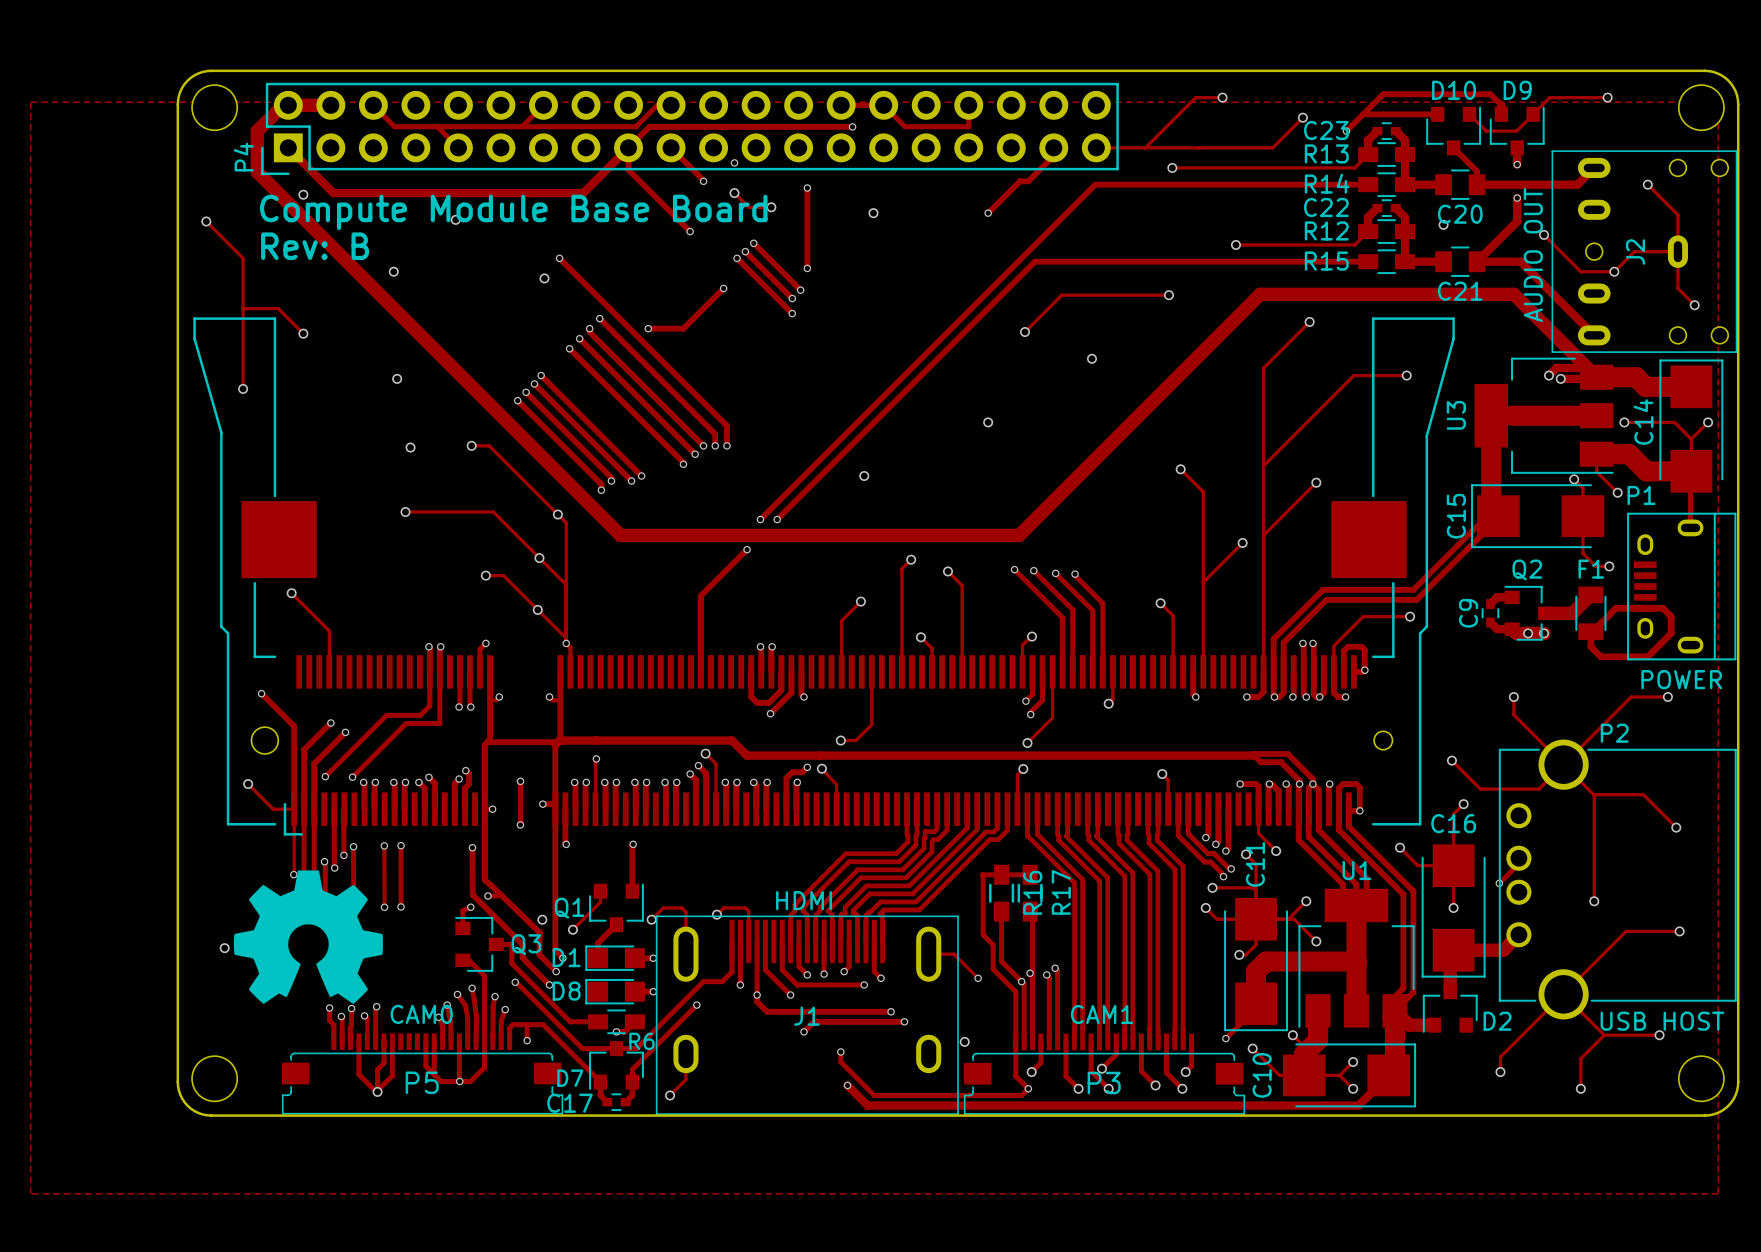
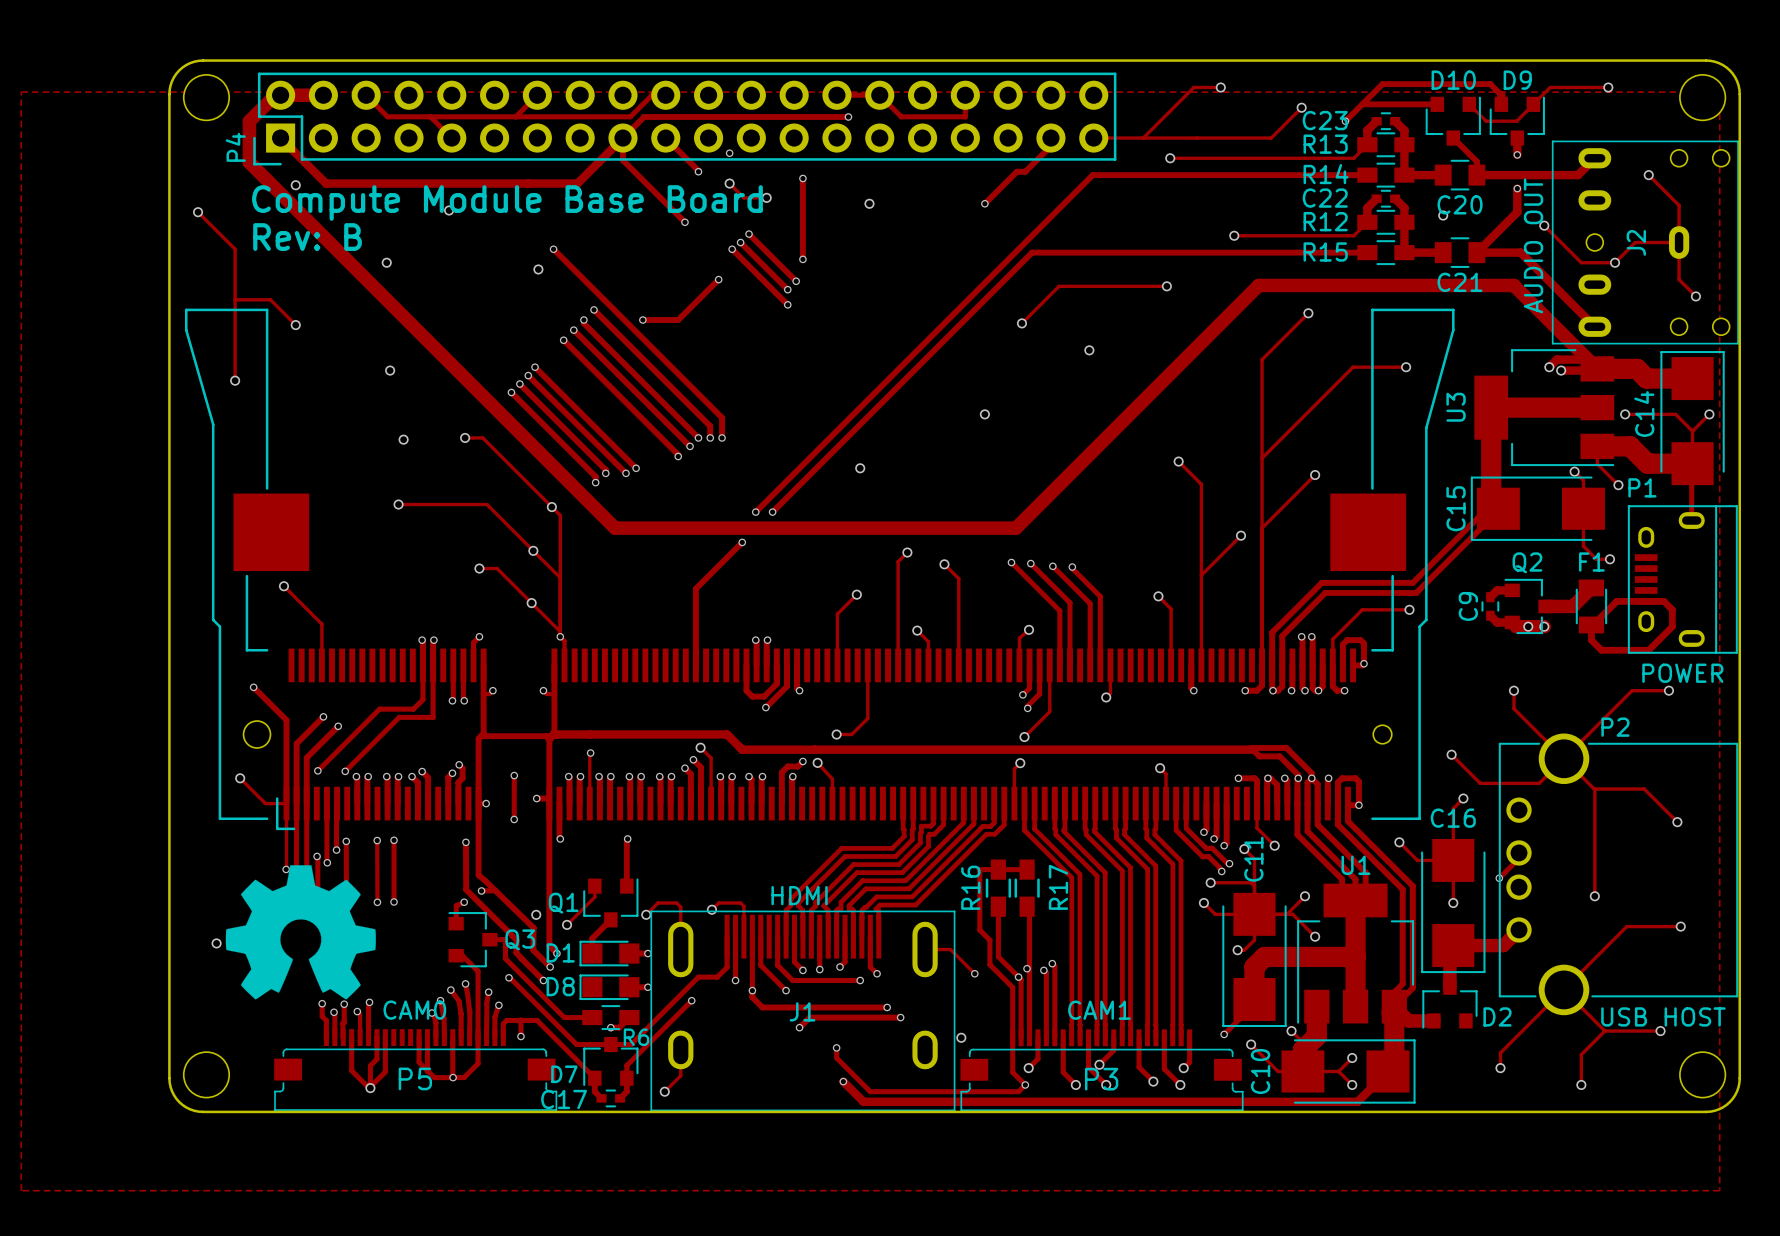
R16 name position: R16 (1032, 892) -> R16 (970, 887)

